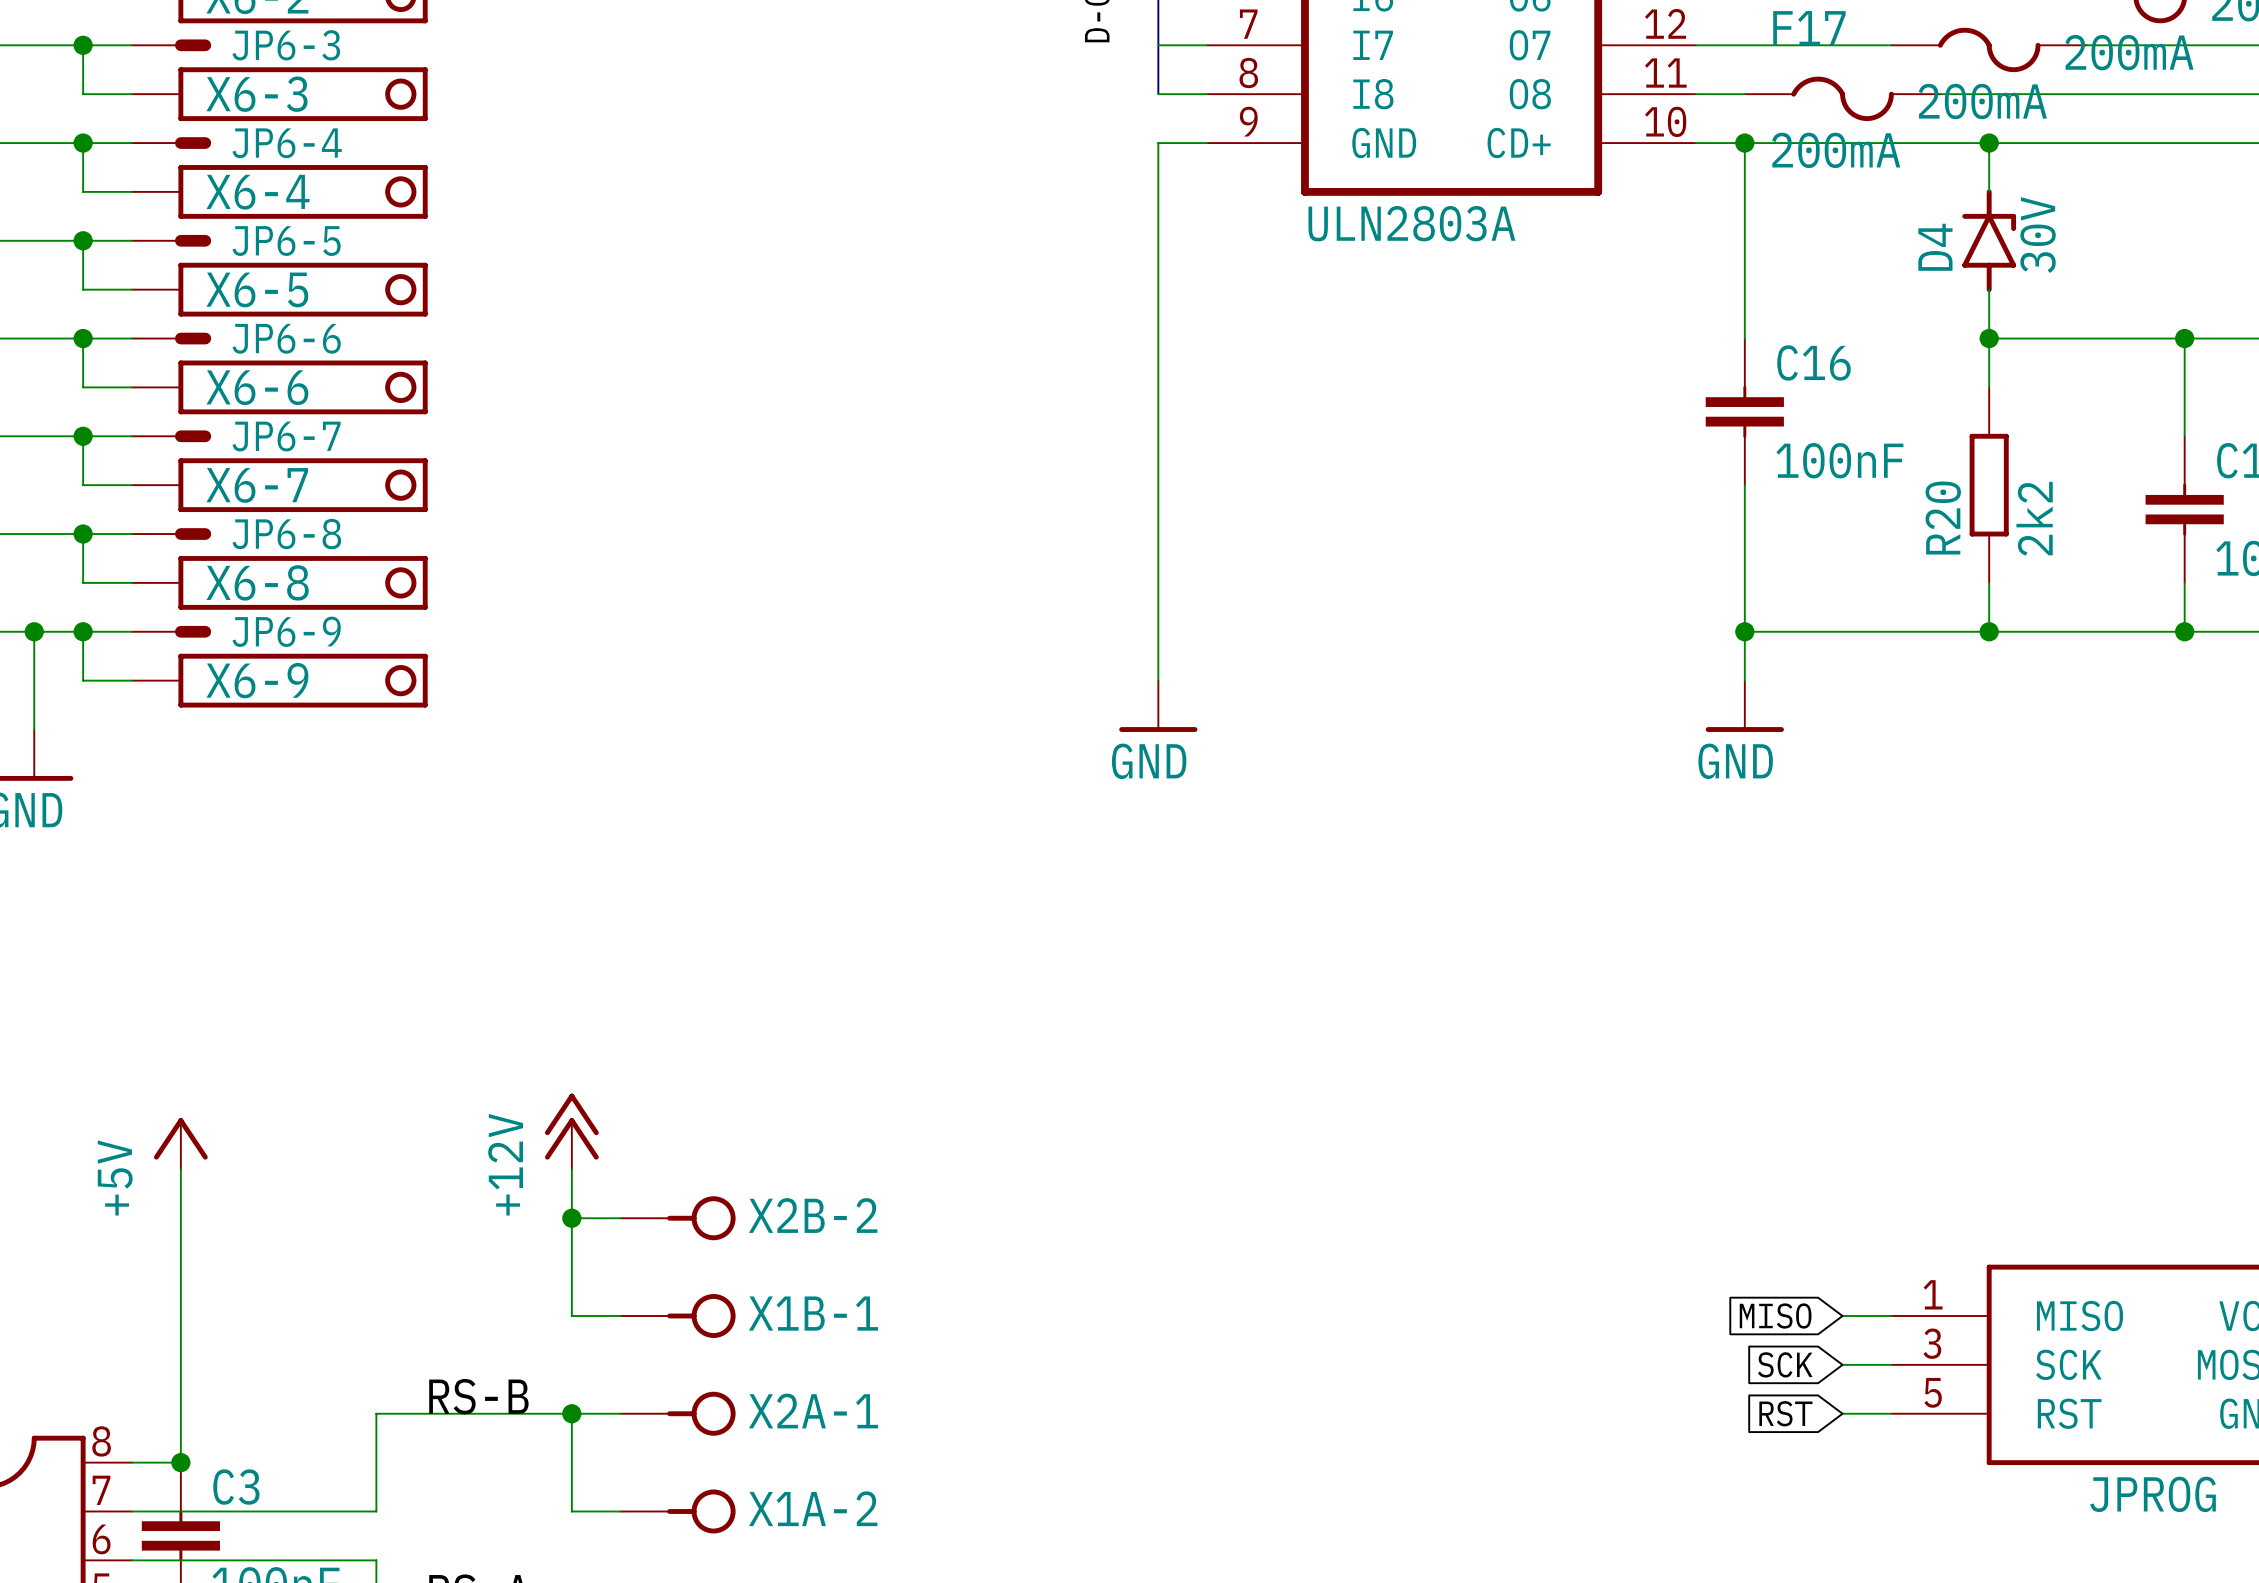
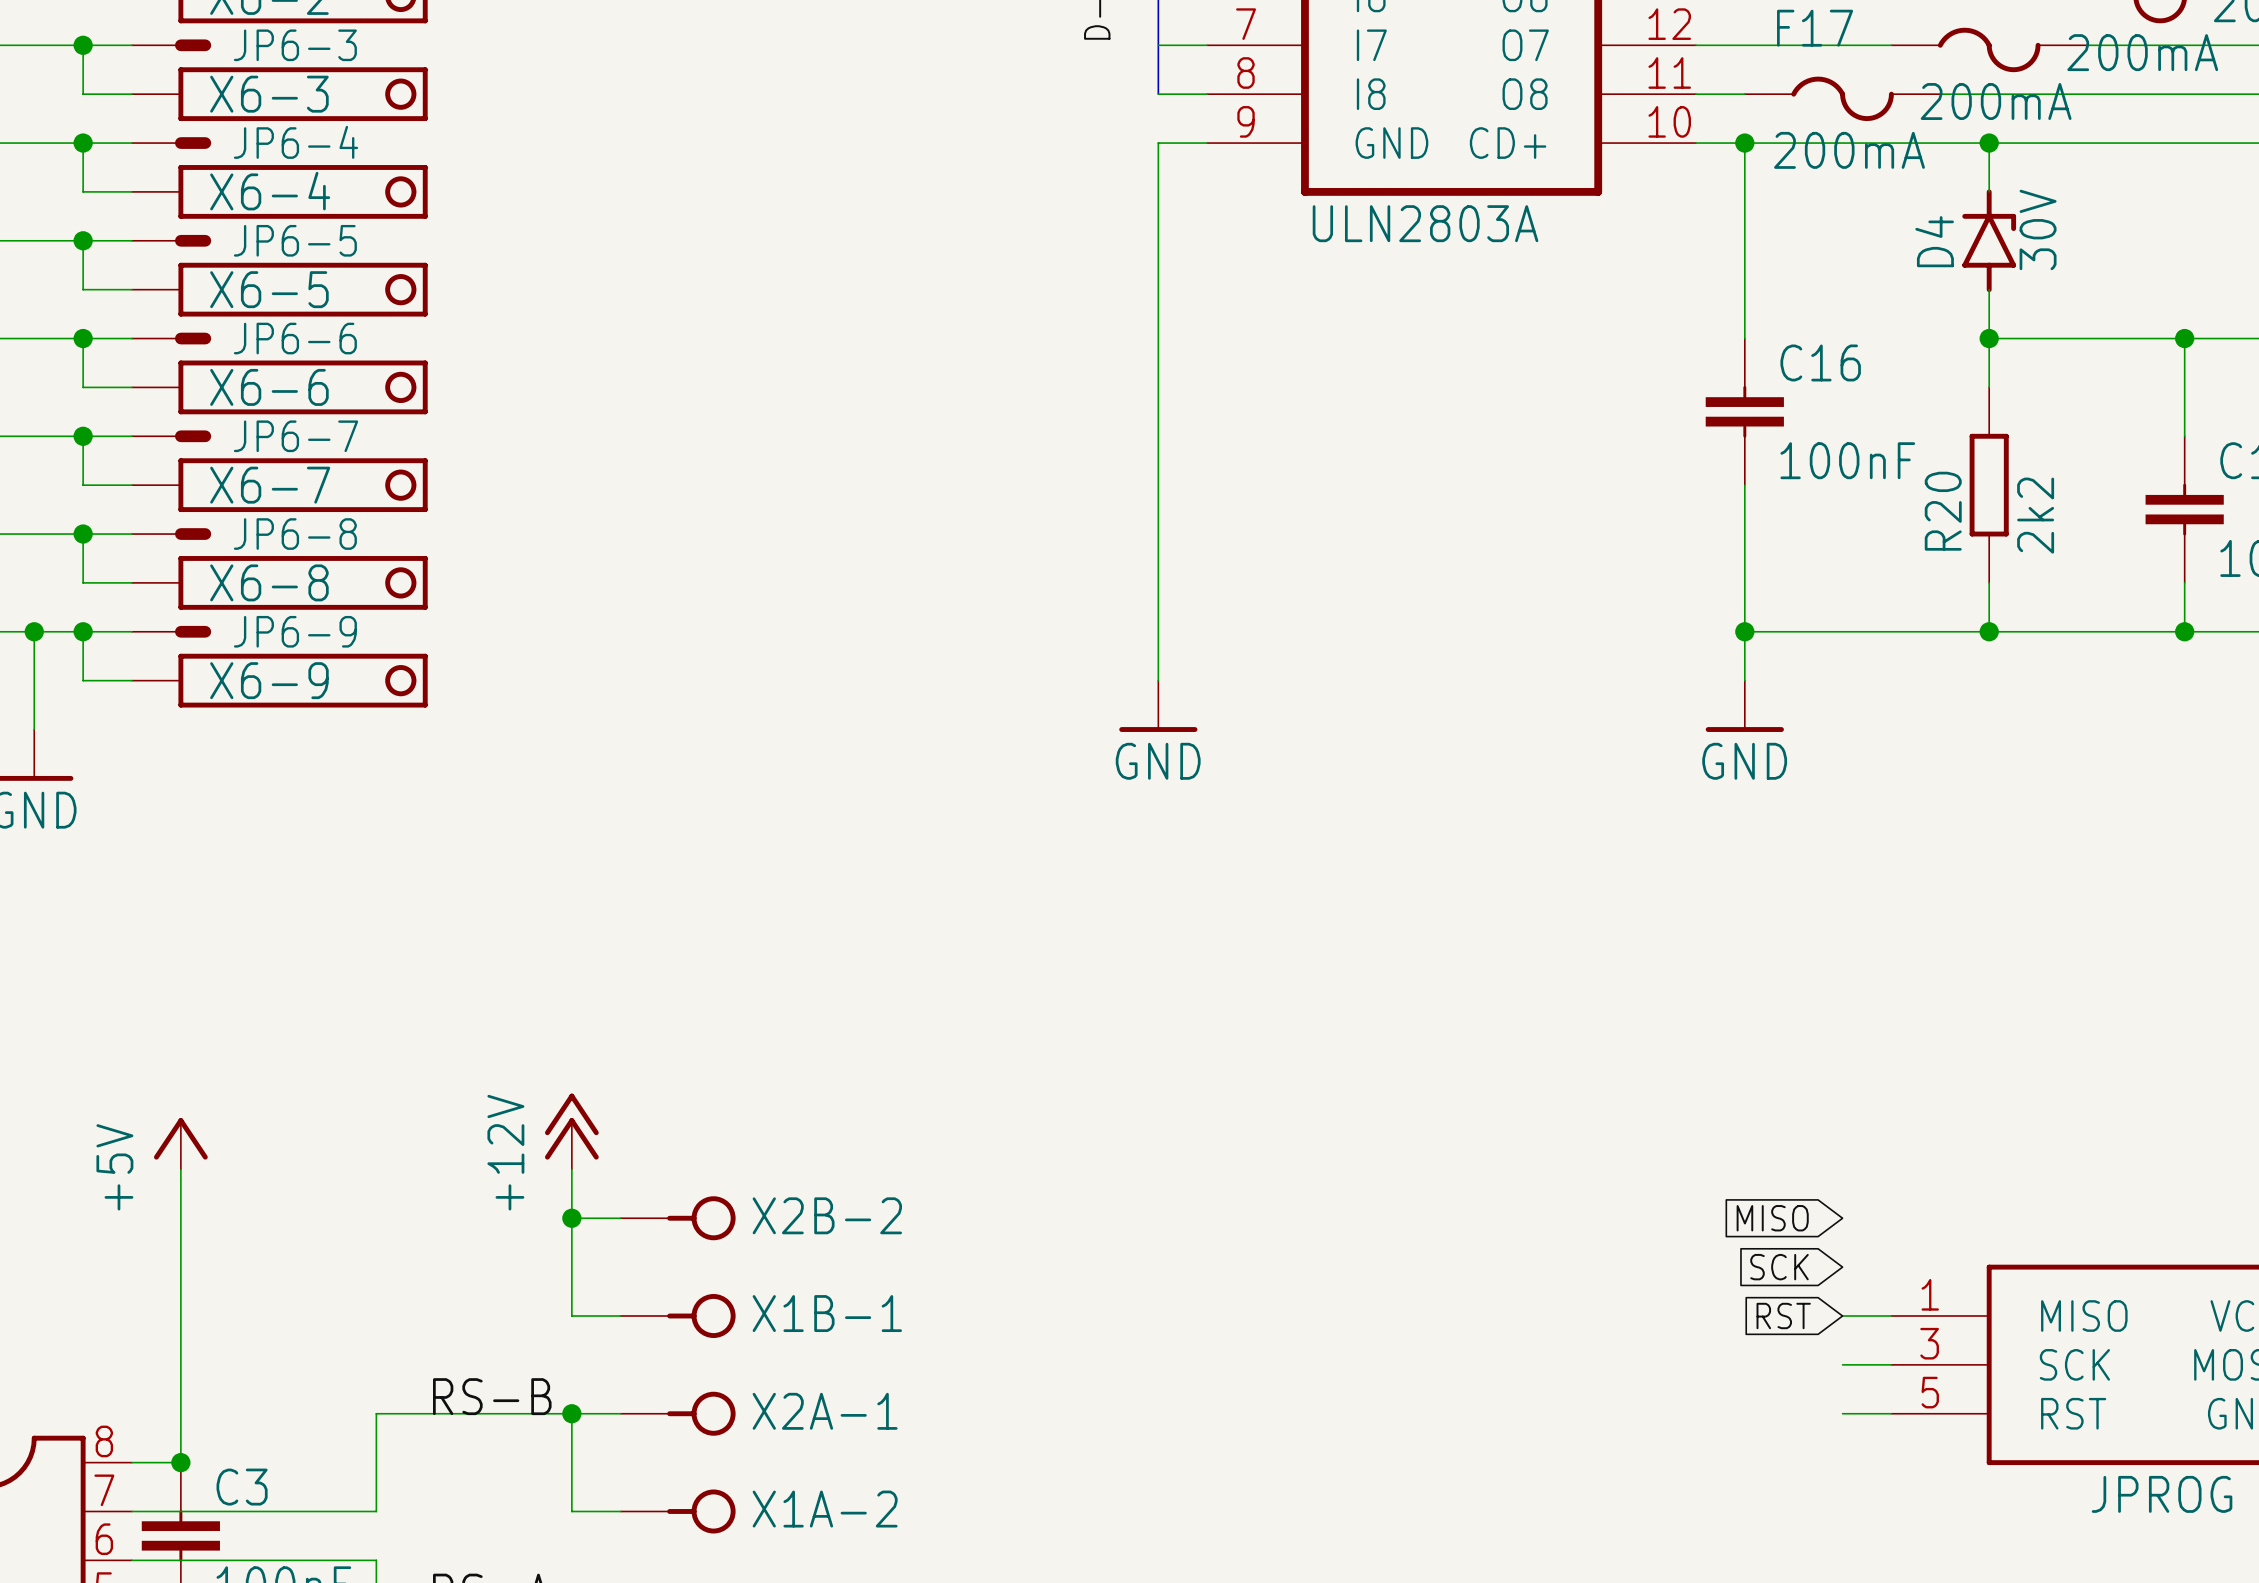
global label: none -> MISO (1772, 1218)
global label: MISO (1775, 1316) -> RST (1783, 1316)
global label position: SCK (1785, 1364) -> SCK (1779, 1267)
global label: RST (1785, 1413) -> none

